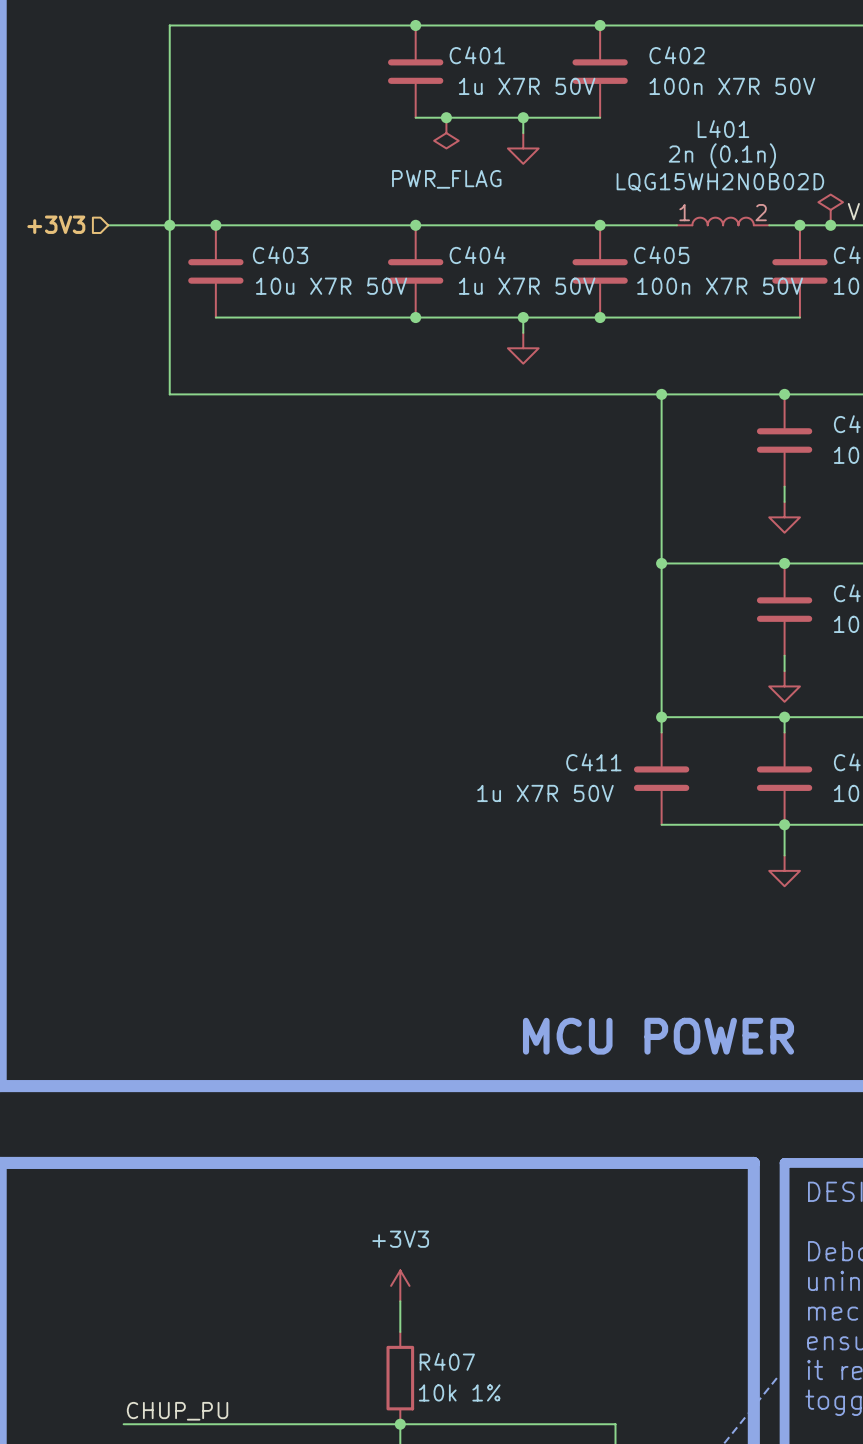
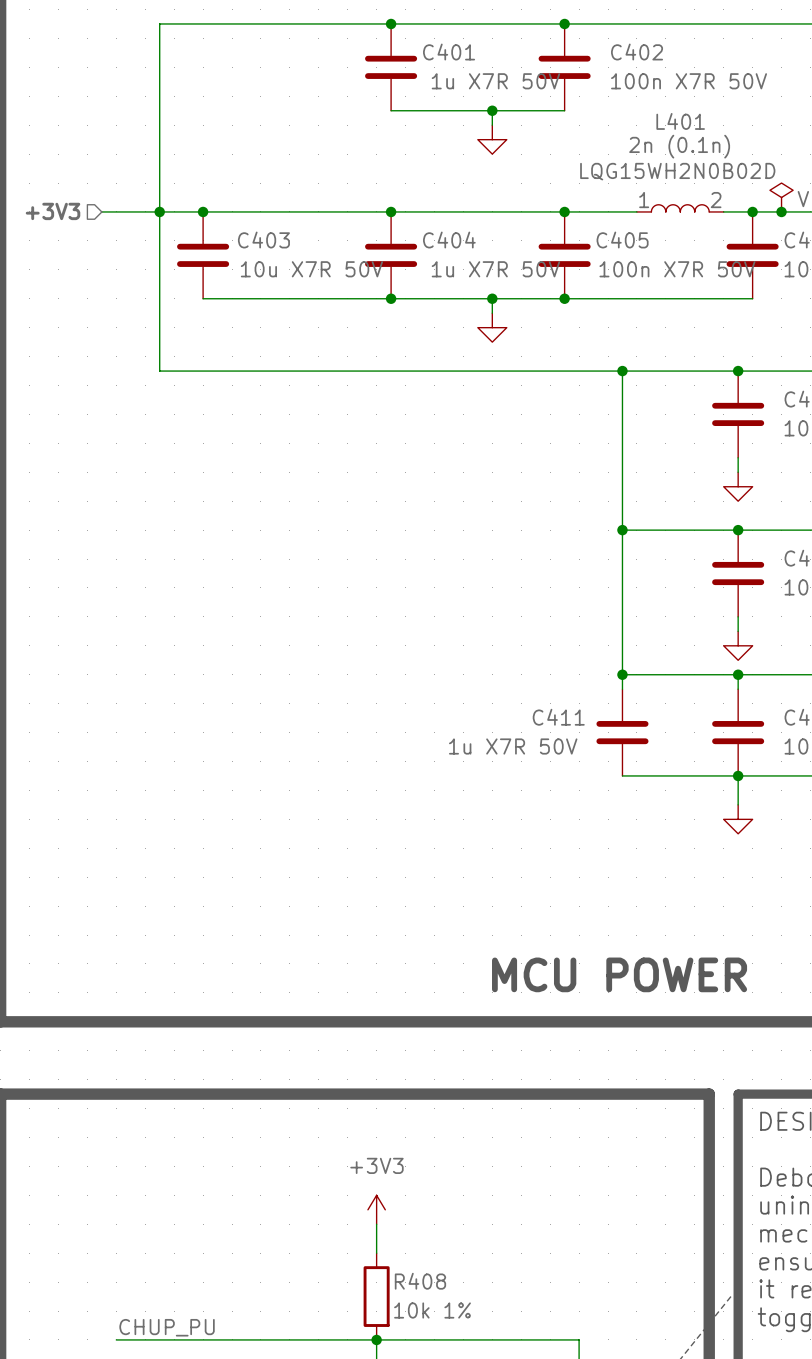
junction: (446, 117) -> none
power symbol: PWR_FLAG (446, 133) -> none
R407 name: R407 (447, 1361) -> R408 (420, 1281)

